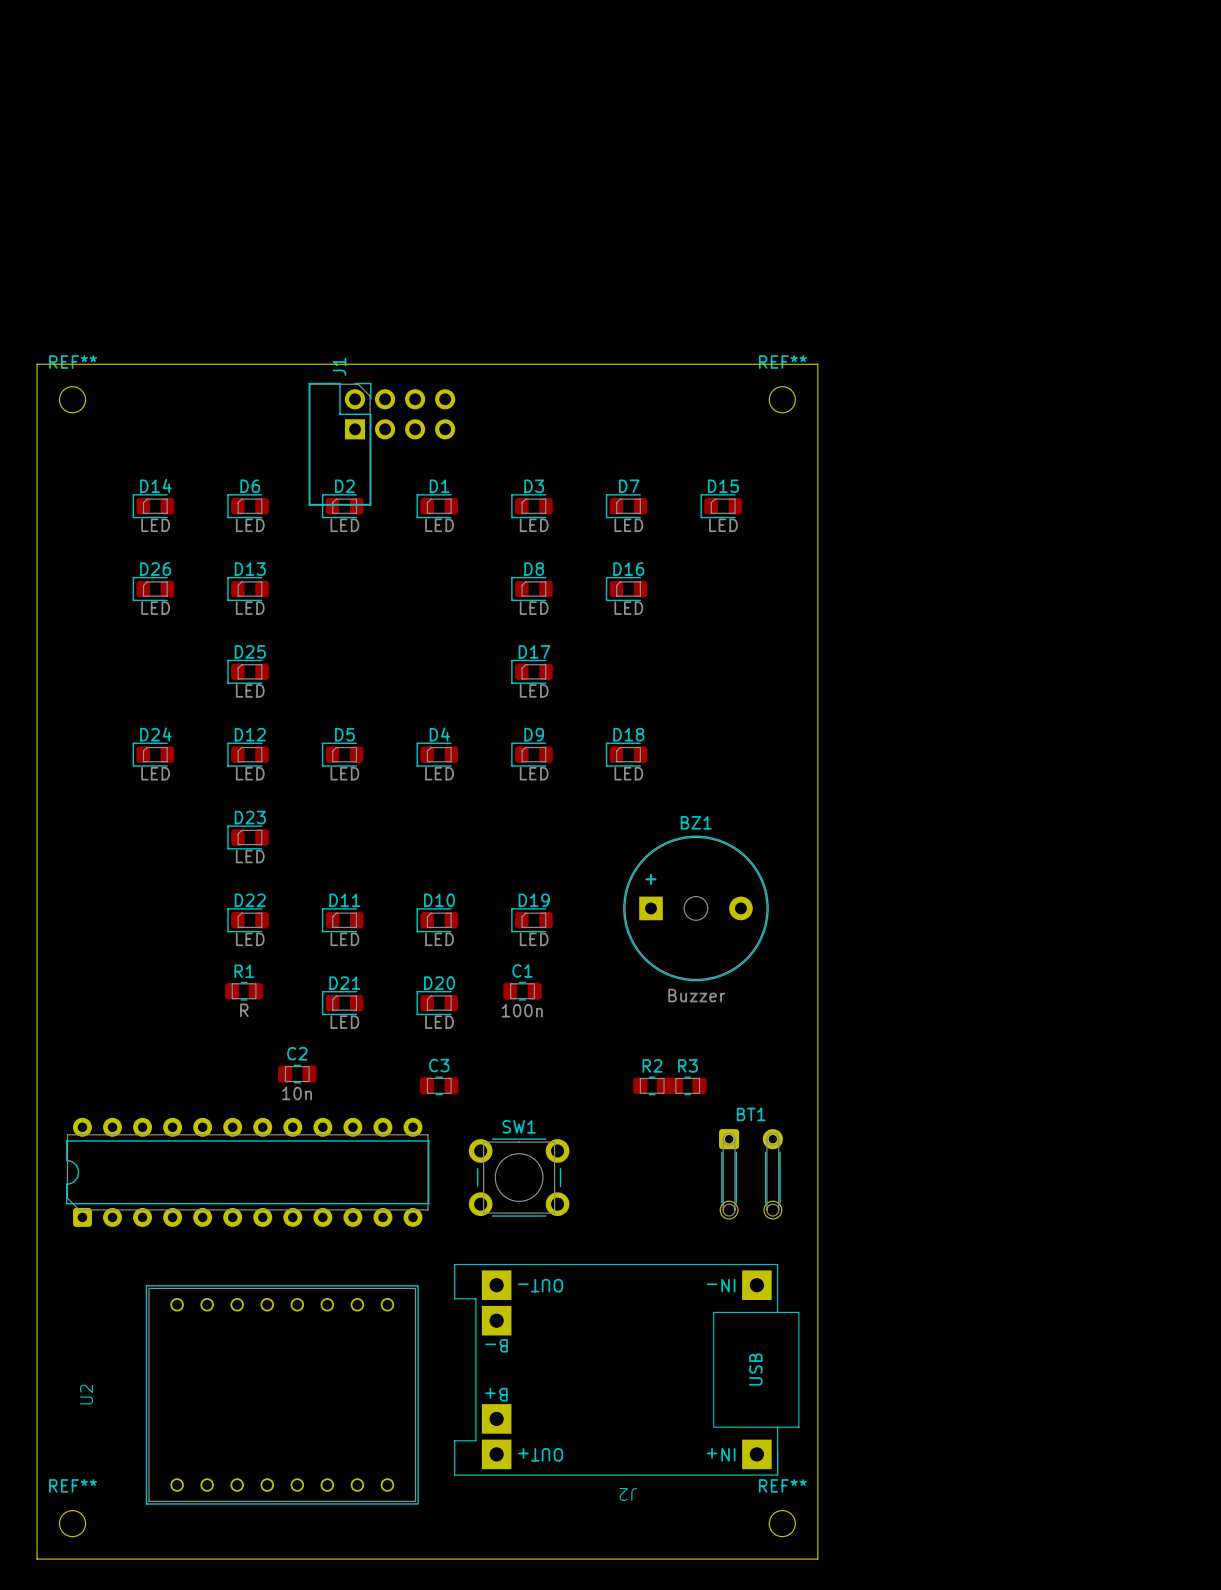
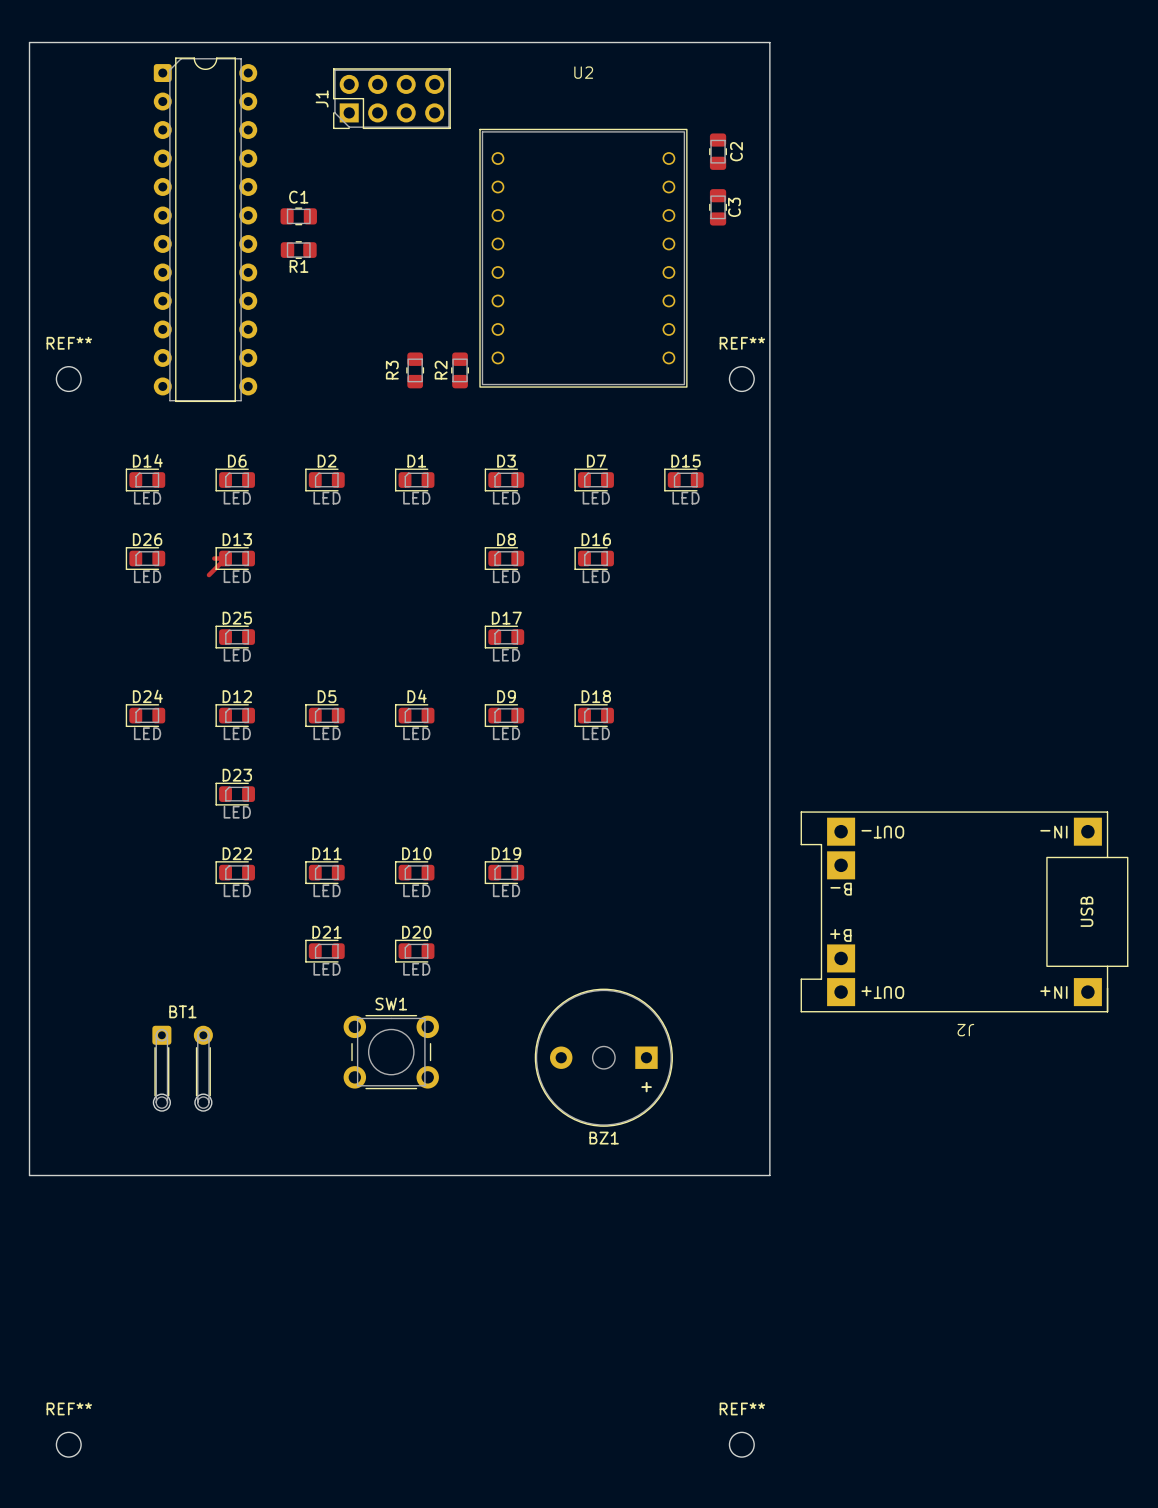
part: none -> (205, 229)
board edge: (37, 364) (817, 364) (817, 1559) (37, 1559) (37, 364) -> (29, 42) (769, 42) (769, 1175) (29, 1175) (29, 42)
J1 name position: J1 (339, 366) -> J1 (322, 98)
J1 footprint: [308, 382, 456, 506] -> [333, 68, 451, 130]
track: none -> (214, 558) (225, 558) (208, 575)
BZ1 rotation: 0° (695, 908) -> 180° (603, 1057)
BZ1 position: (695, 908) -> (603, 1057)
R1 name position: R1 (244, 971) -> R1 (299, 266)
R1 position: (244, 991) -> (298, 250)
C1 position: (522, 991) -> (298, 216)
BZ1 value: Buzzer (696, 995) -> none
R1 value: R (244, 1010) -> none
C1 value: 100n (522, 1010) -> none
R2 name position: R2 (652, 1065) -> R2 (441, 370)
R3 name position: R3 (687, 1065) -> R3 (392, 370)
C2 rotation: 0° (297, 1074) -> 90° clockwise (718, 151)
C2 position: (297, 1074) -> (718, 151)
C3 rotation: 0° (439, 1085) -> 90° clockwise (718, 207)
C3 position: (439, 1085) -> (718, 207)
R2 rotation: 0° (652, 1085) -> 90° clockwise (460, 370)
R2 position: (652, 1085) -> (460, 370)
R3 rotation: 0° (687, 1085) -> 90° clockwise (415, 370)
R3 position: (687, 1085) -> (415, 370)
C2 value: 10n (297, 1093) -> none
part: (247, 1172) -> none
BT1 position: (750, 1174) -> (182, 1068)
SW1 position: (519, 1177) -> (391, 1052)
J2 position: (626, 1369) -> (964, 911)
U2 rotation: 0° (282, 1394) -> 90° clockwise (583, 258)
U2 position: (282, 1394) -> (583, 258)

